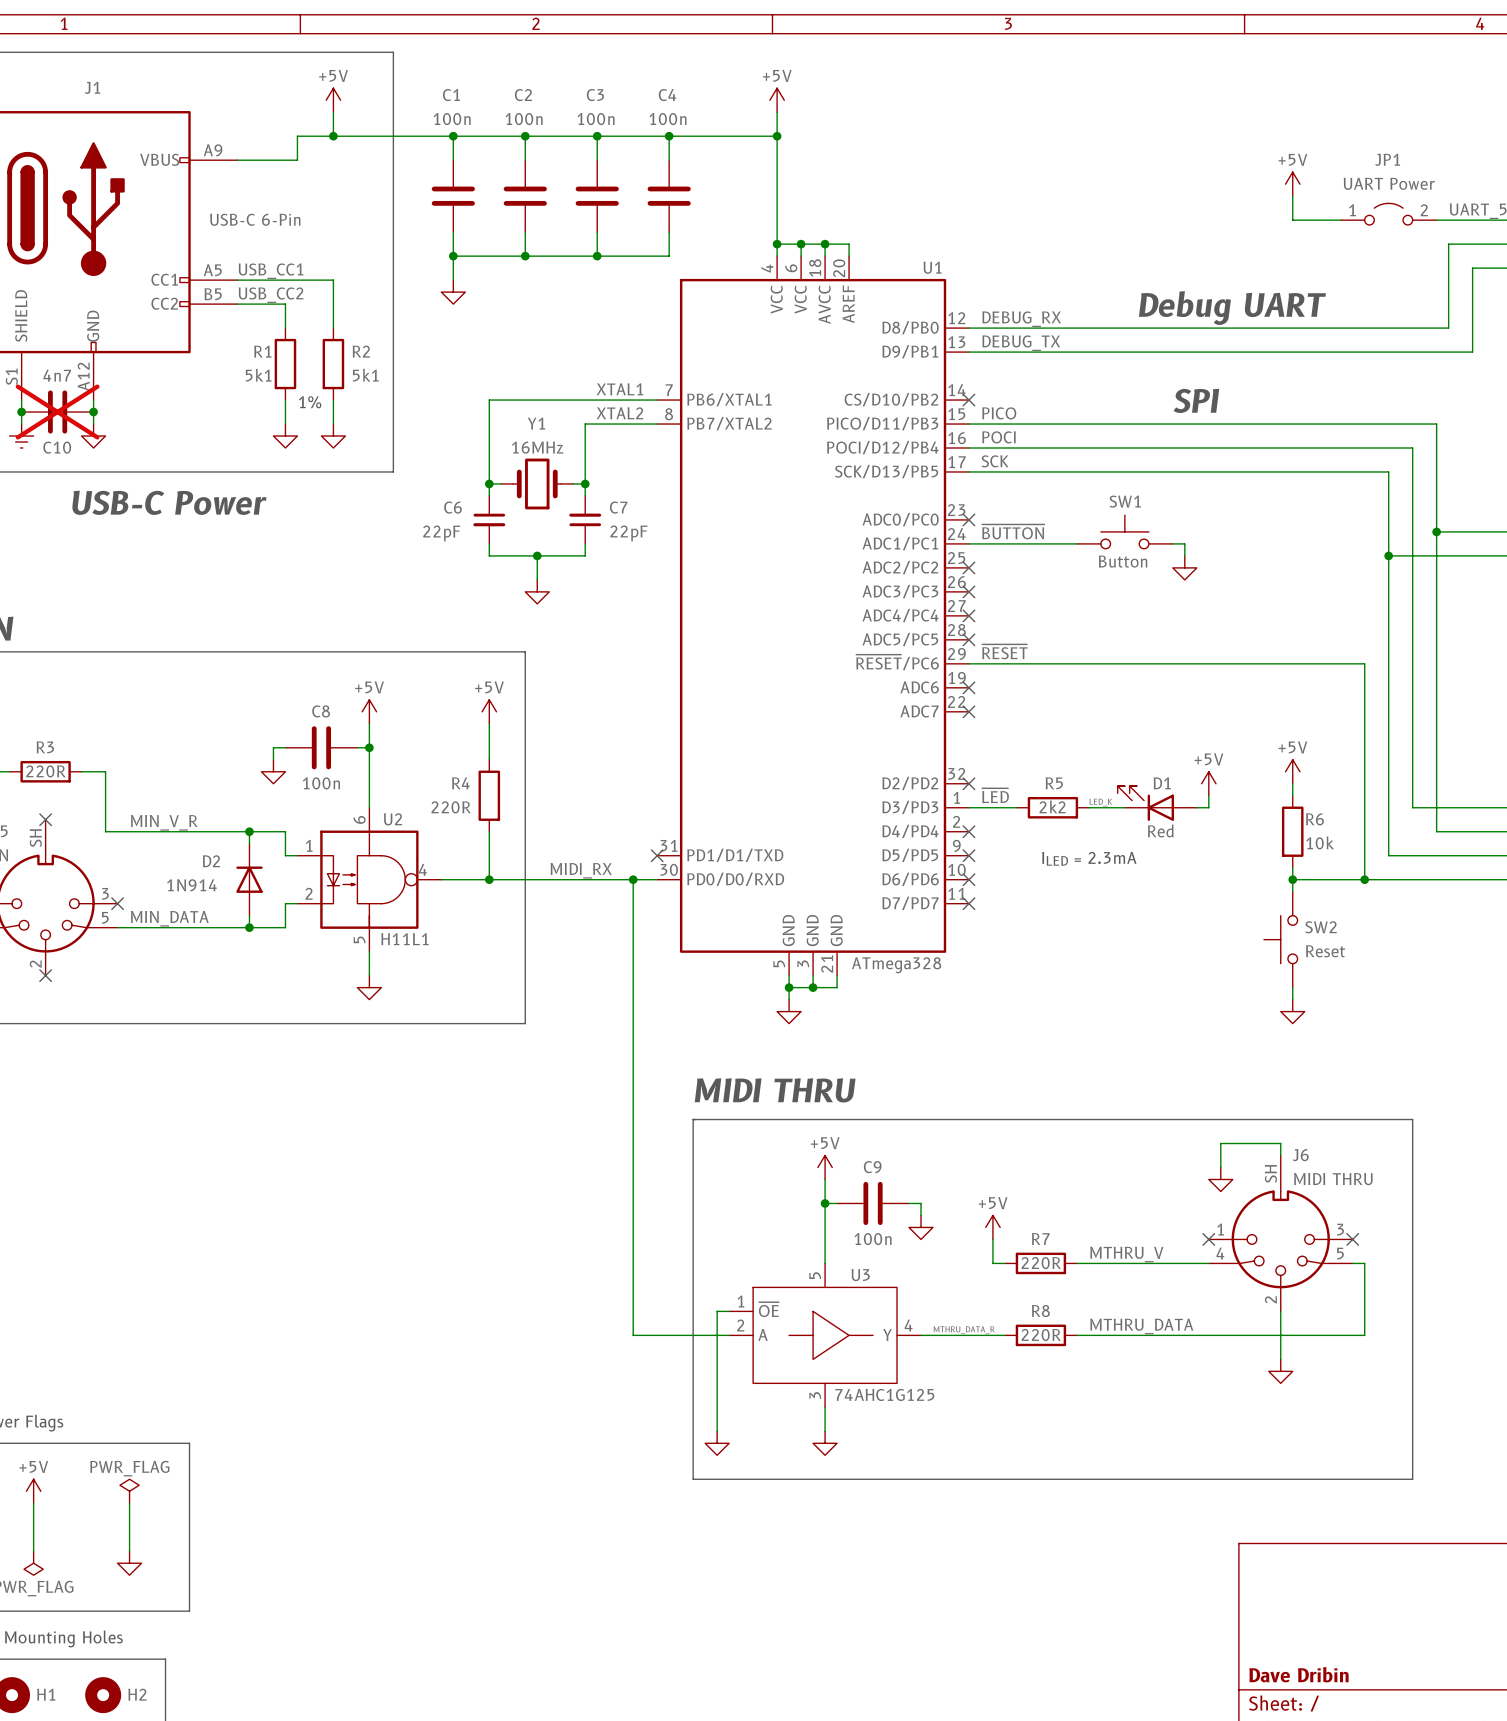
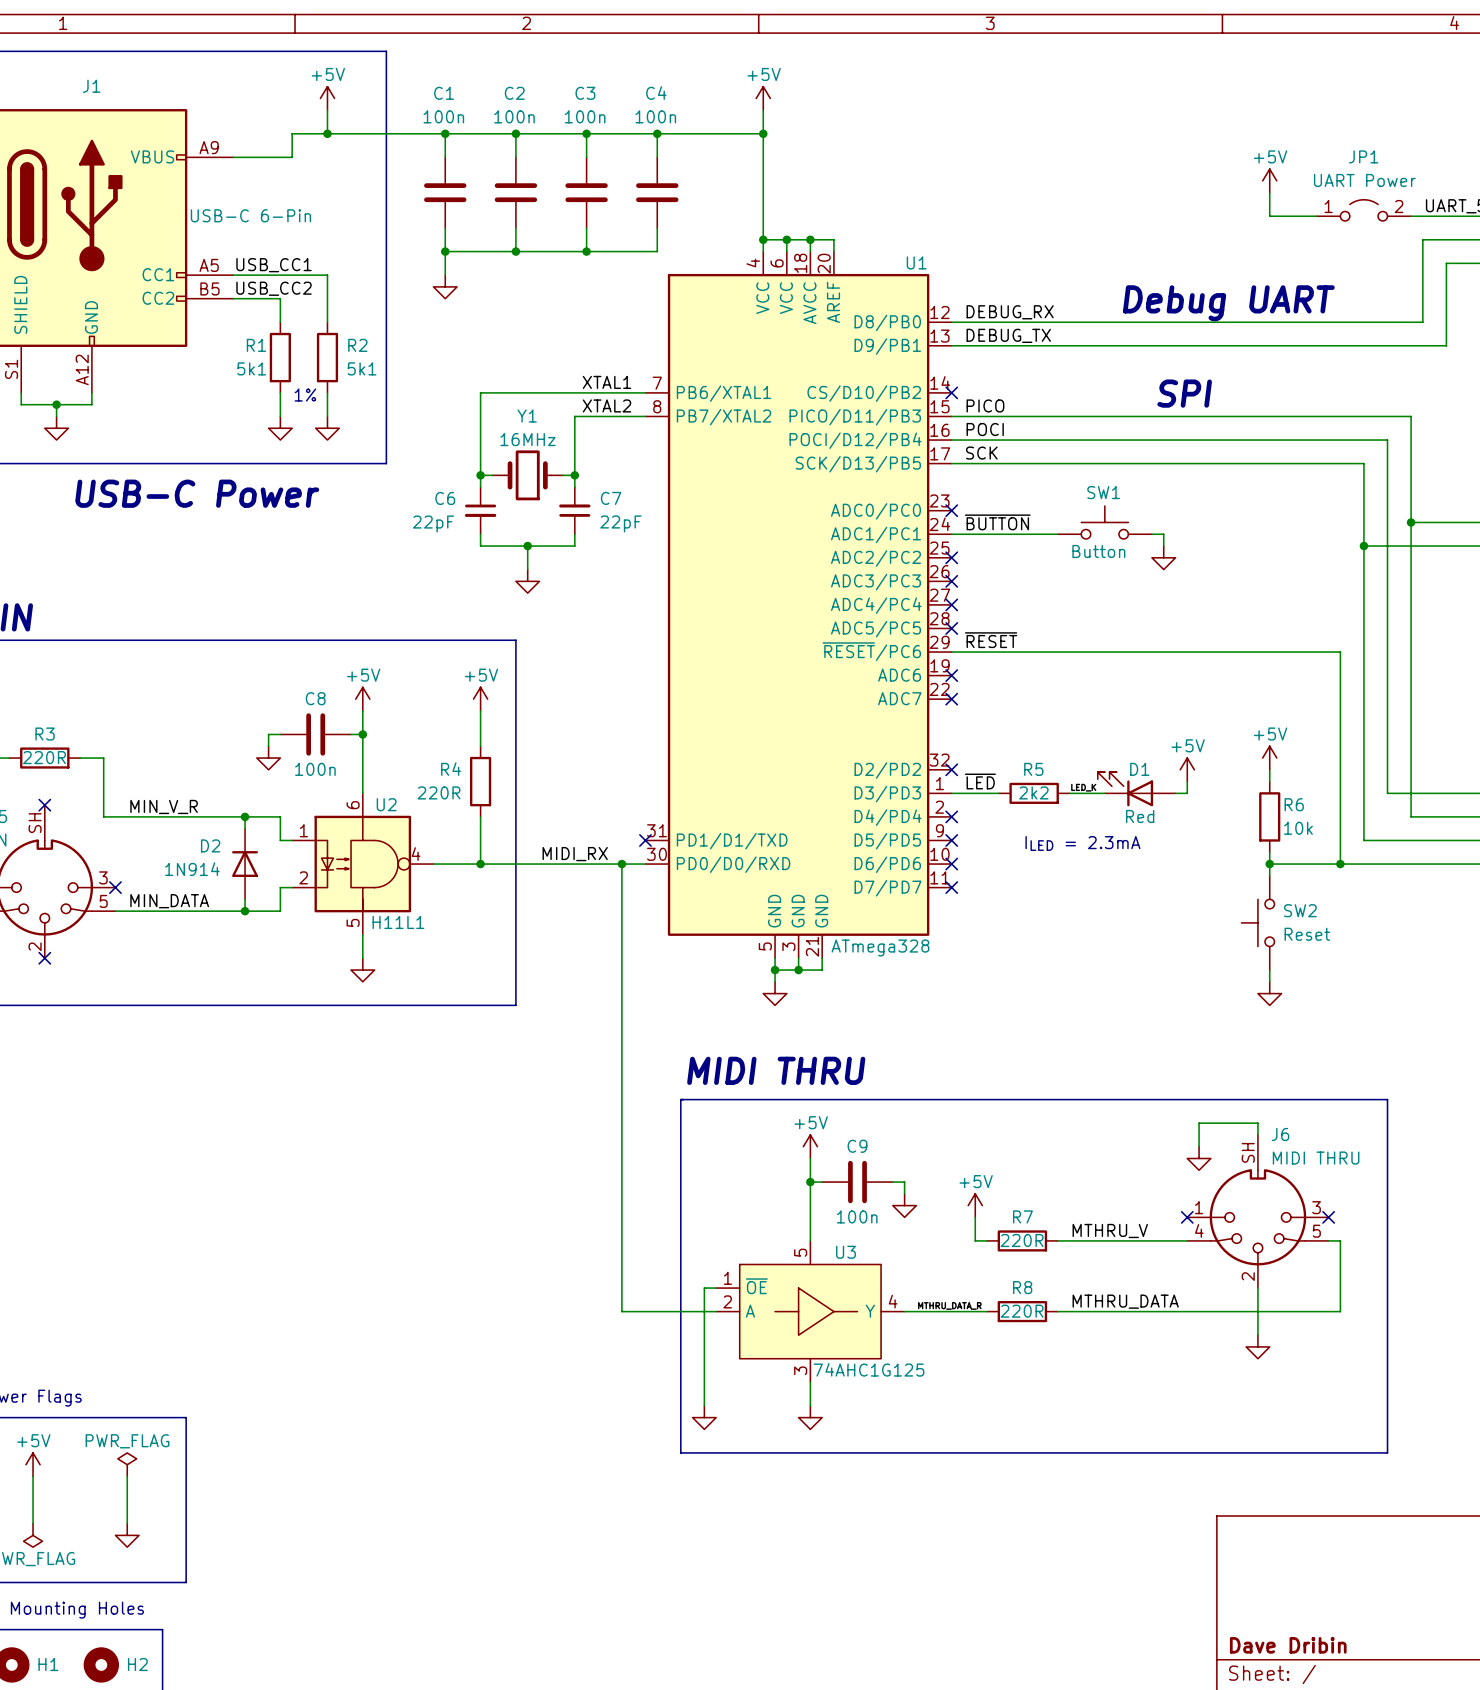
junction: (21, 412) -> none
junction: none -> (56, 404)
C10: 4n7 (57, 412) -> none
wire: (93, 412) (93, 424) -> (56, 404) (56, 416)
junction: (93, 412) -> none
power symbol: (21, 436) -> none
power symbol position: (93, 436) -> (56, 428)

